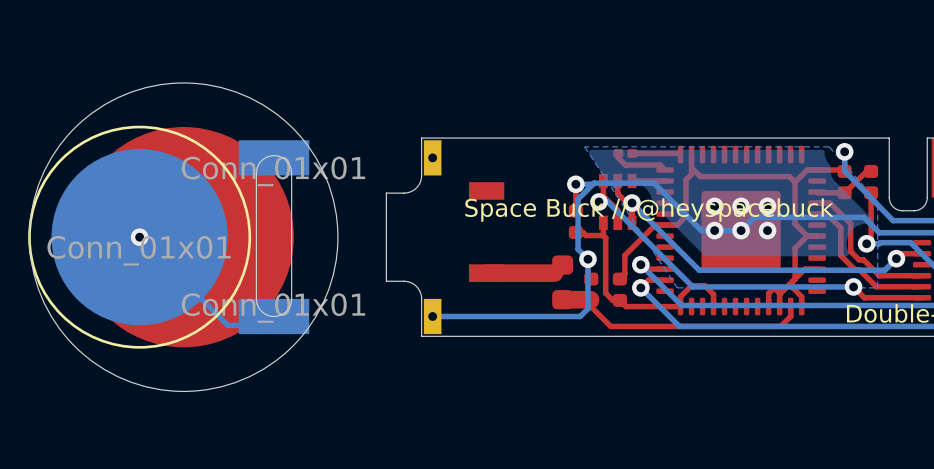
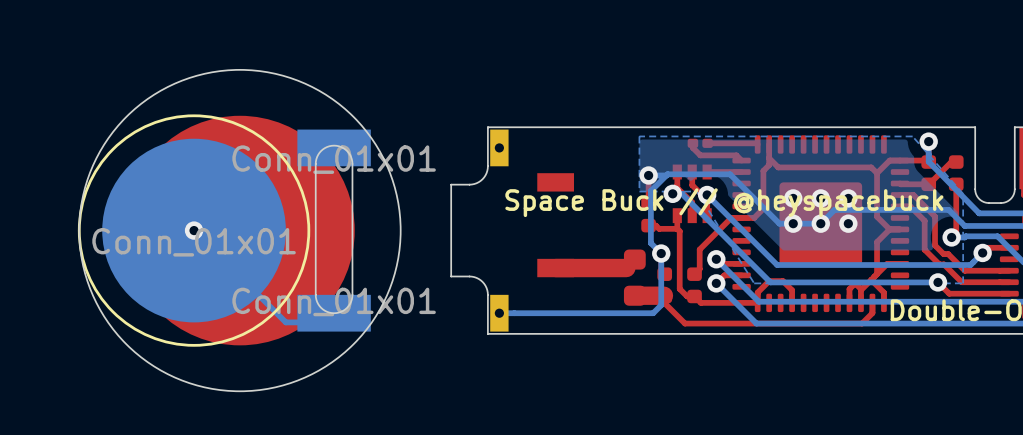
bottom zone outline: (584, 146) (677, 287) -> (657, 136) (639, 136) (639, 191) (696, 191) (754, 283)

